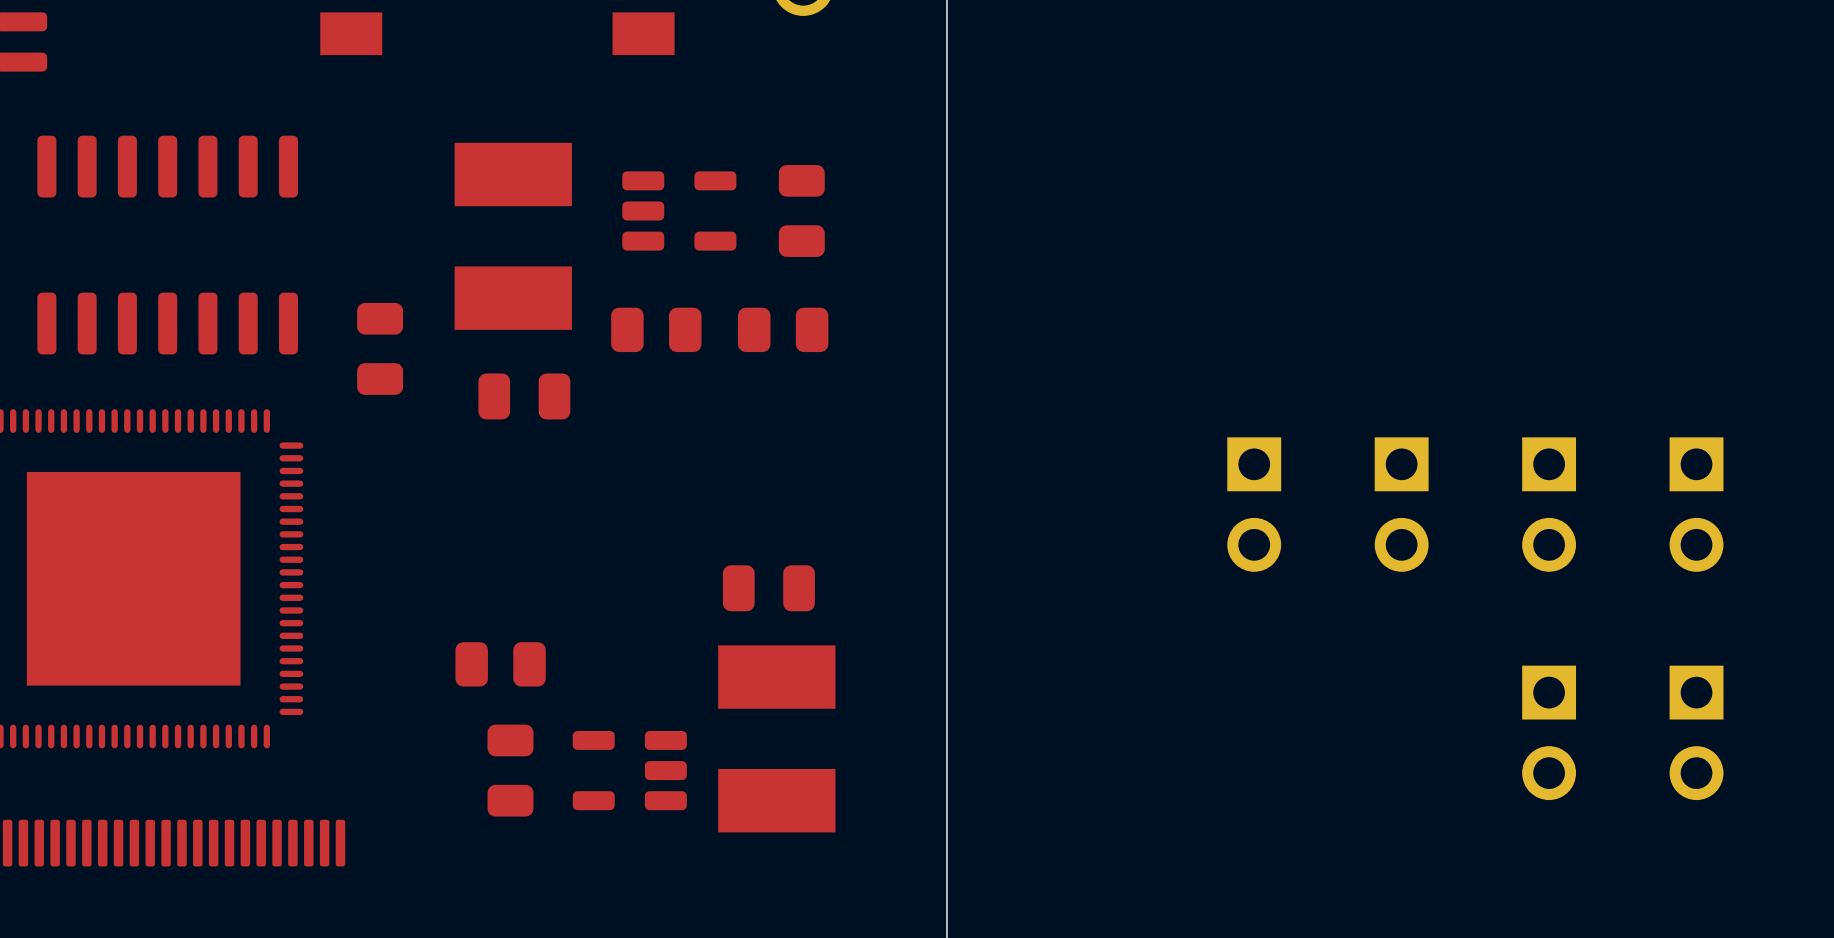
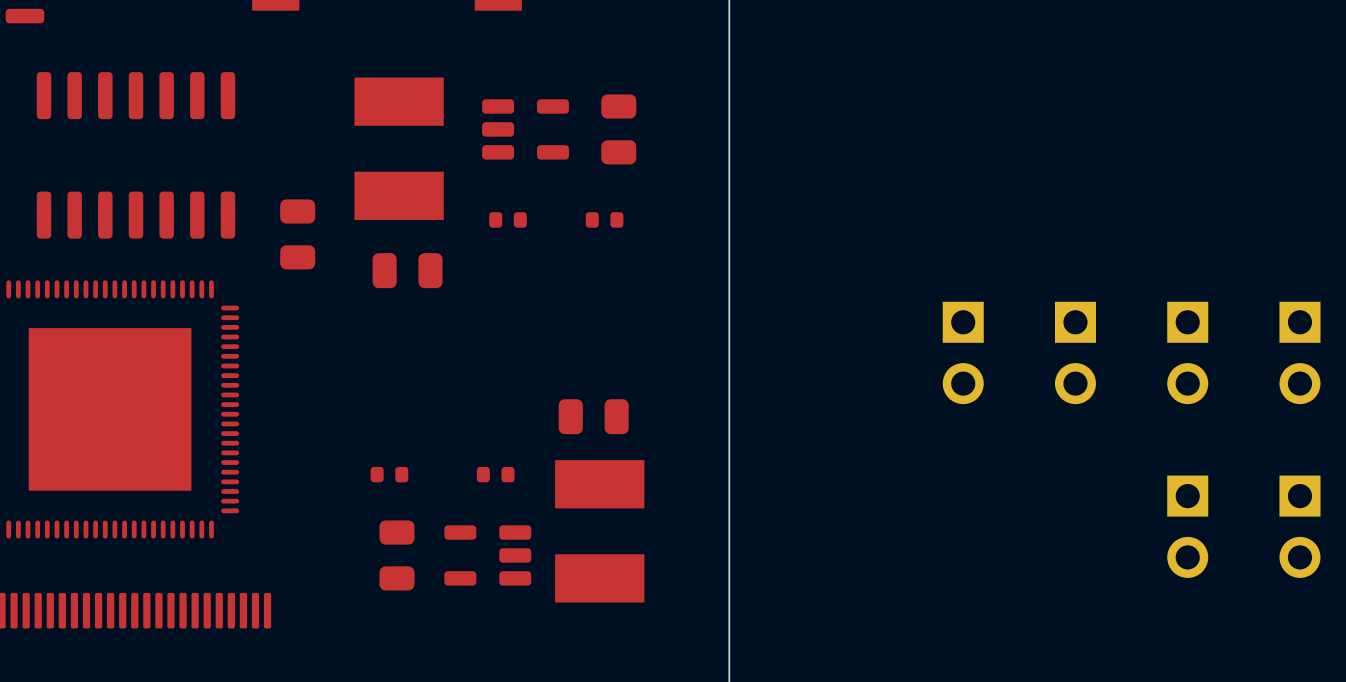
part footprint: [611, 307, 702, 353] -> [489, 212, 527, 228]
part footprint: [737, 307, 829, 353] -> [585, 212, 624, 228]
part footprint: [455, 642, 546, 687] -> [370, 466, 409, 483]
part: none -> (495, 474)

